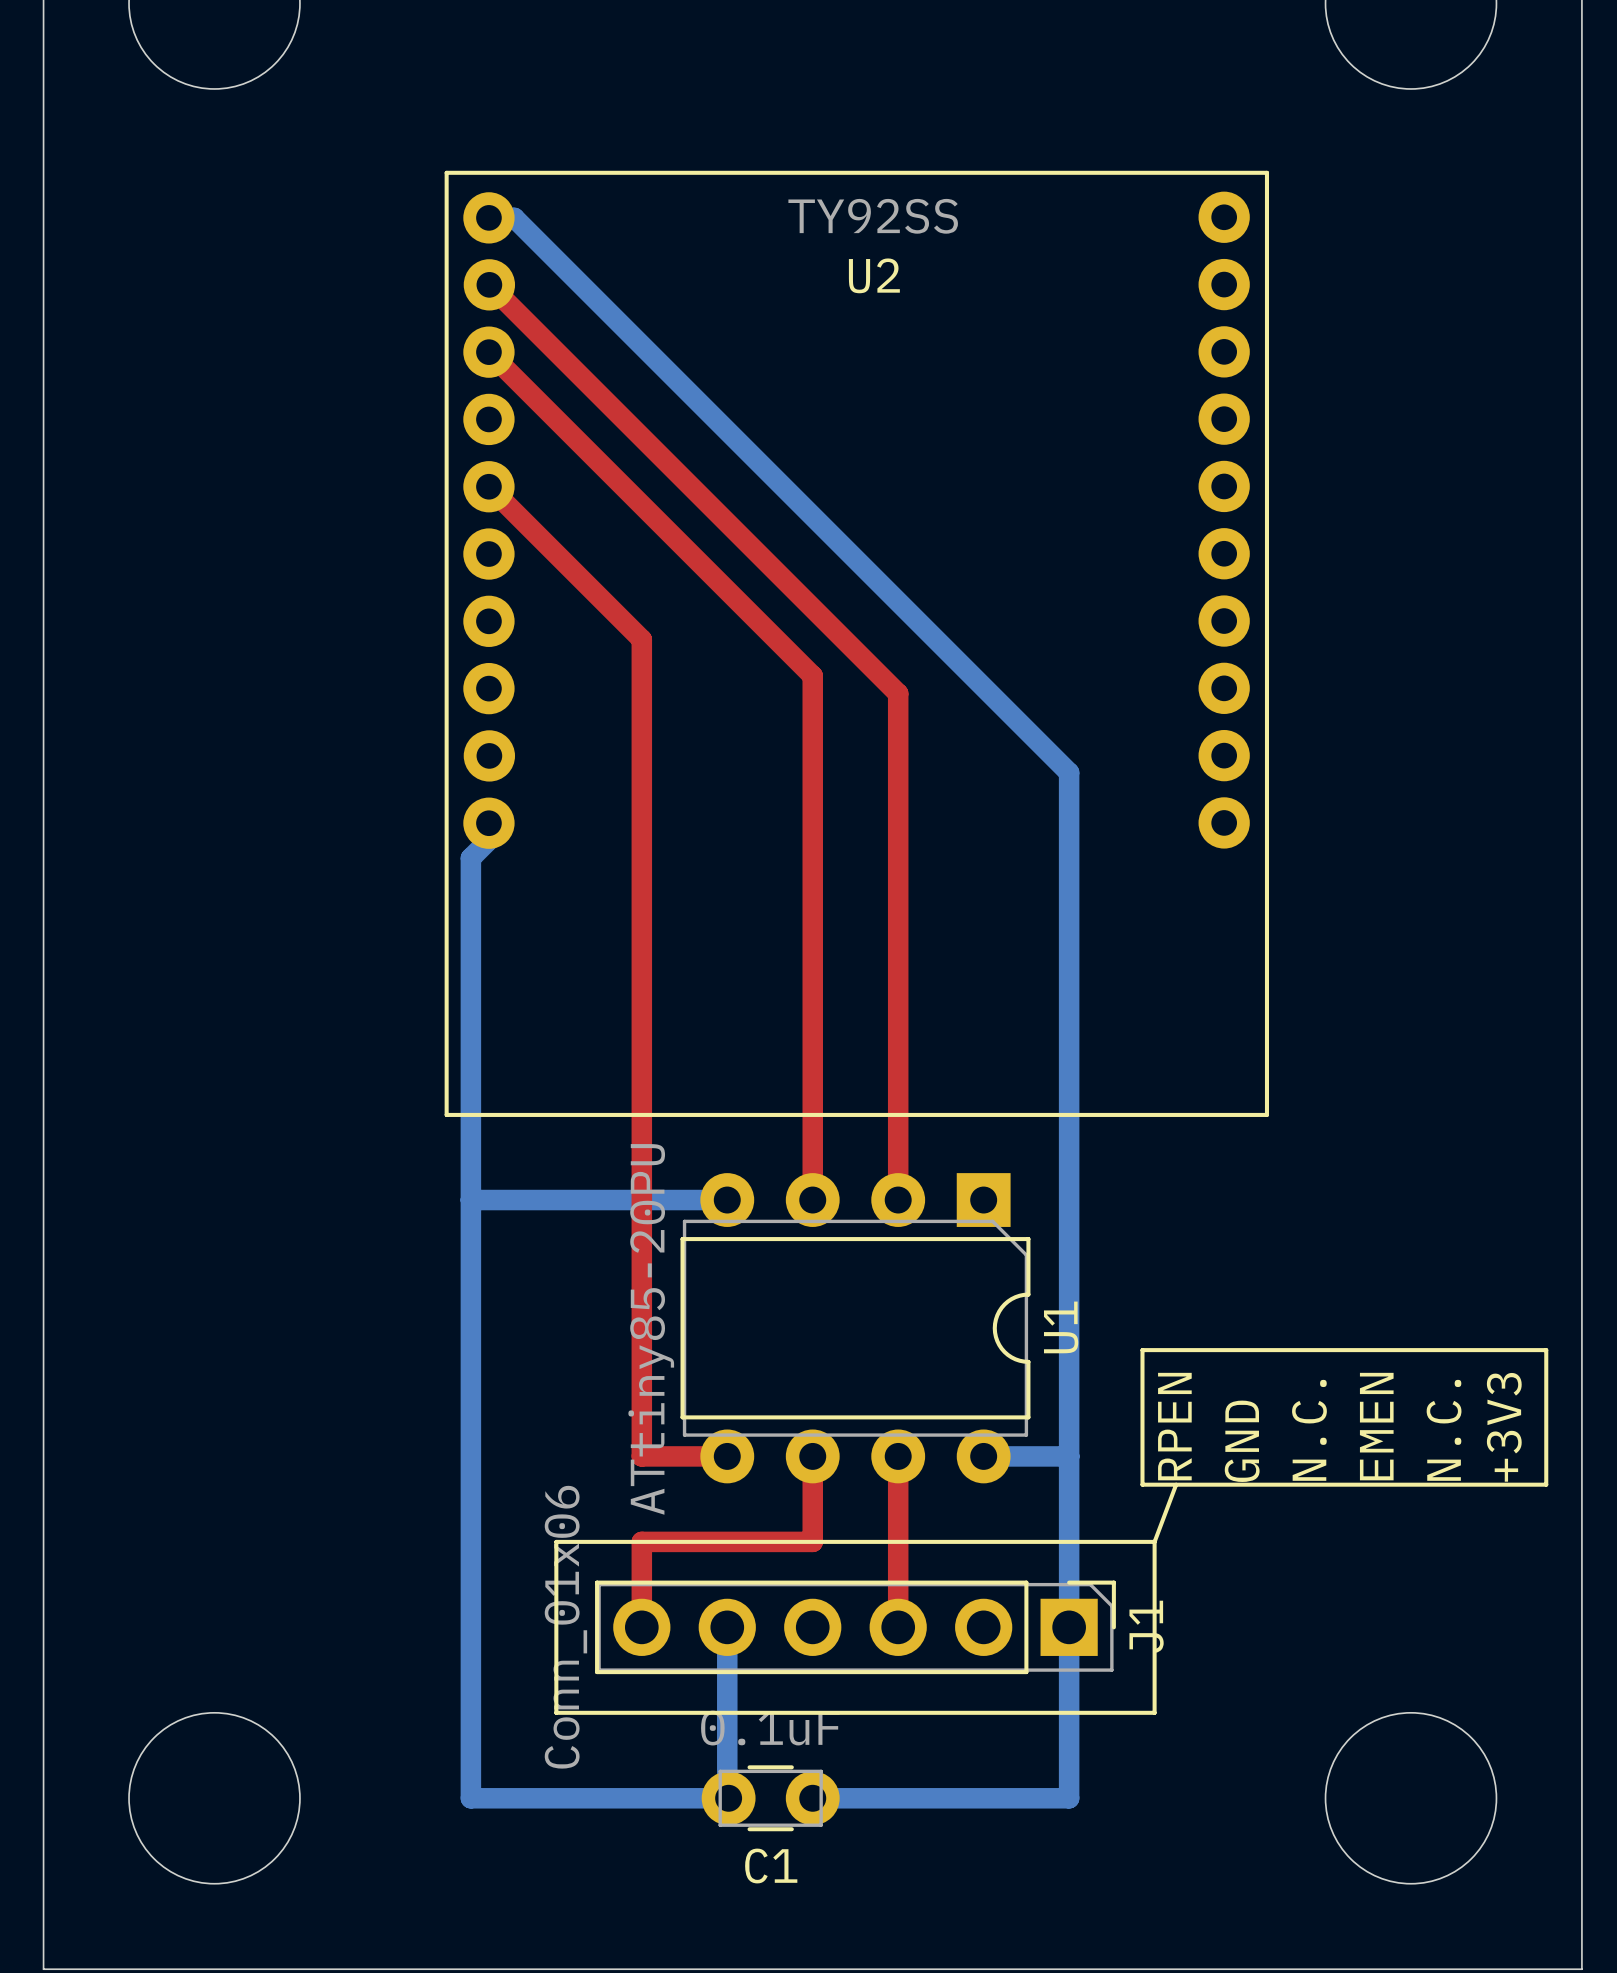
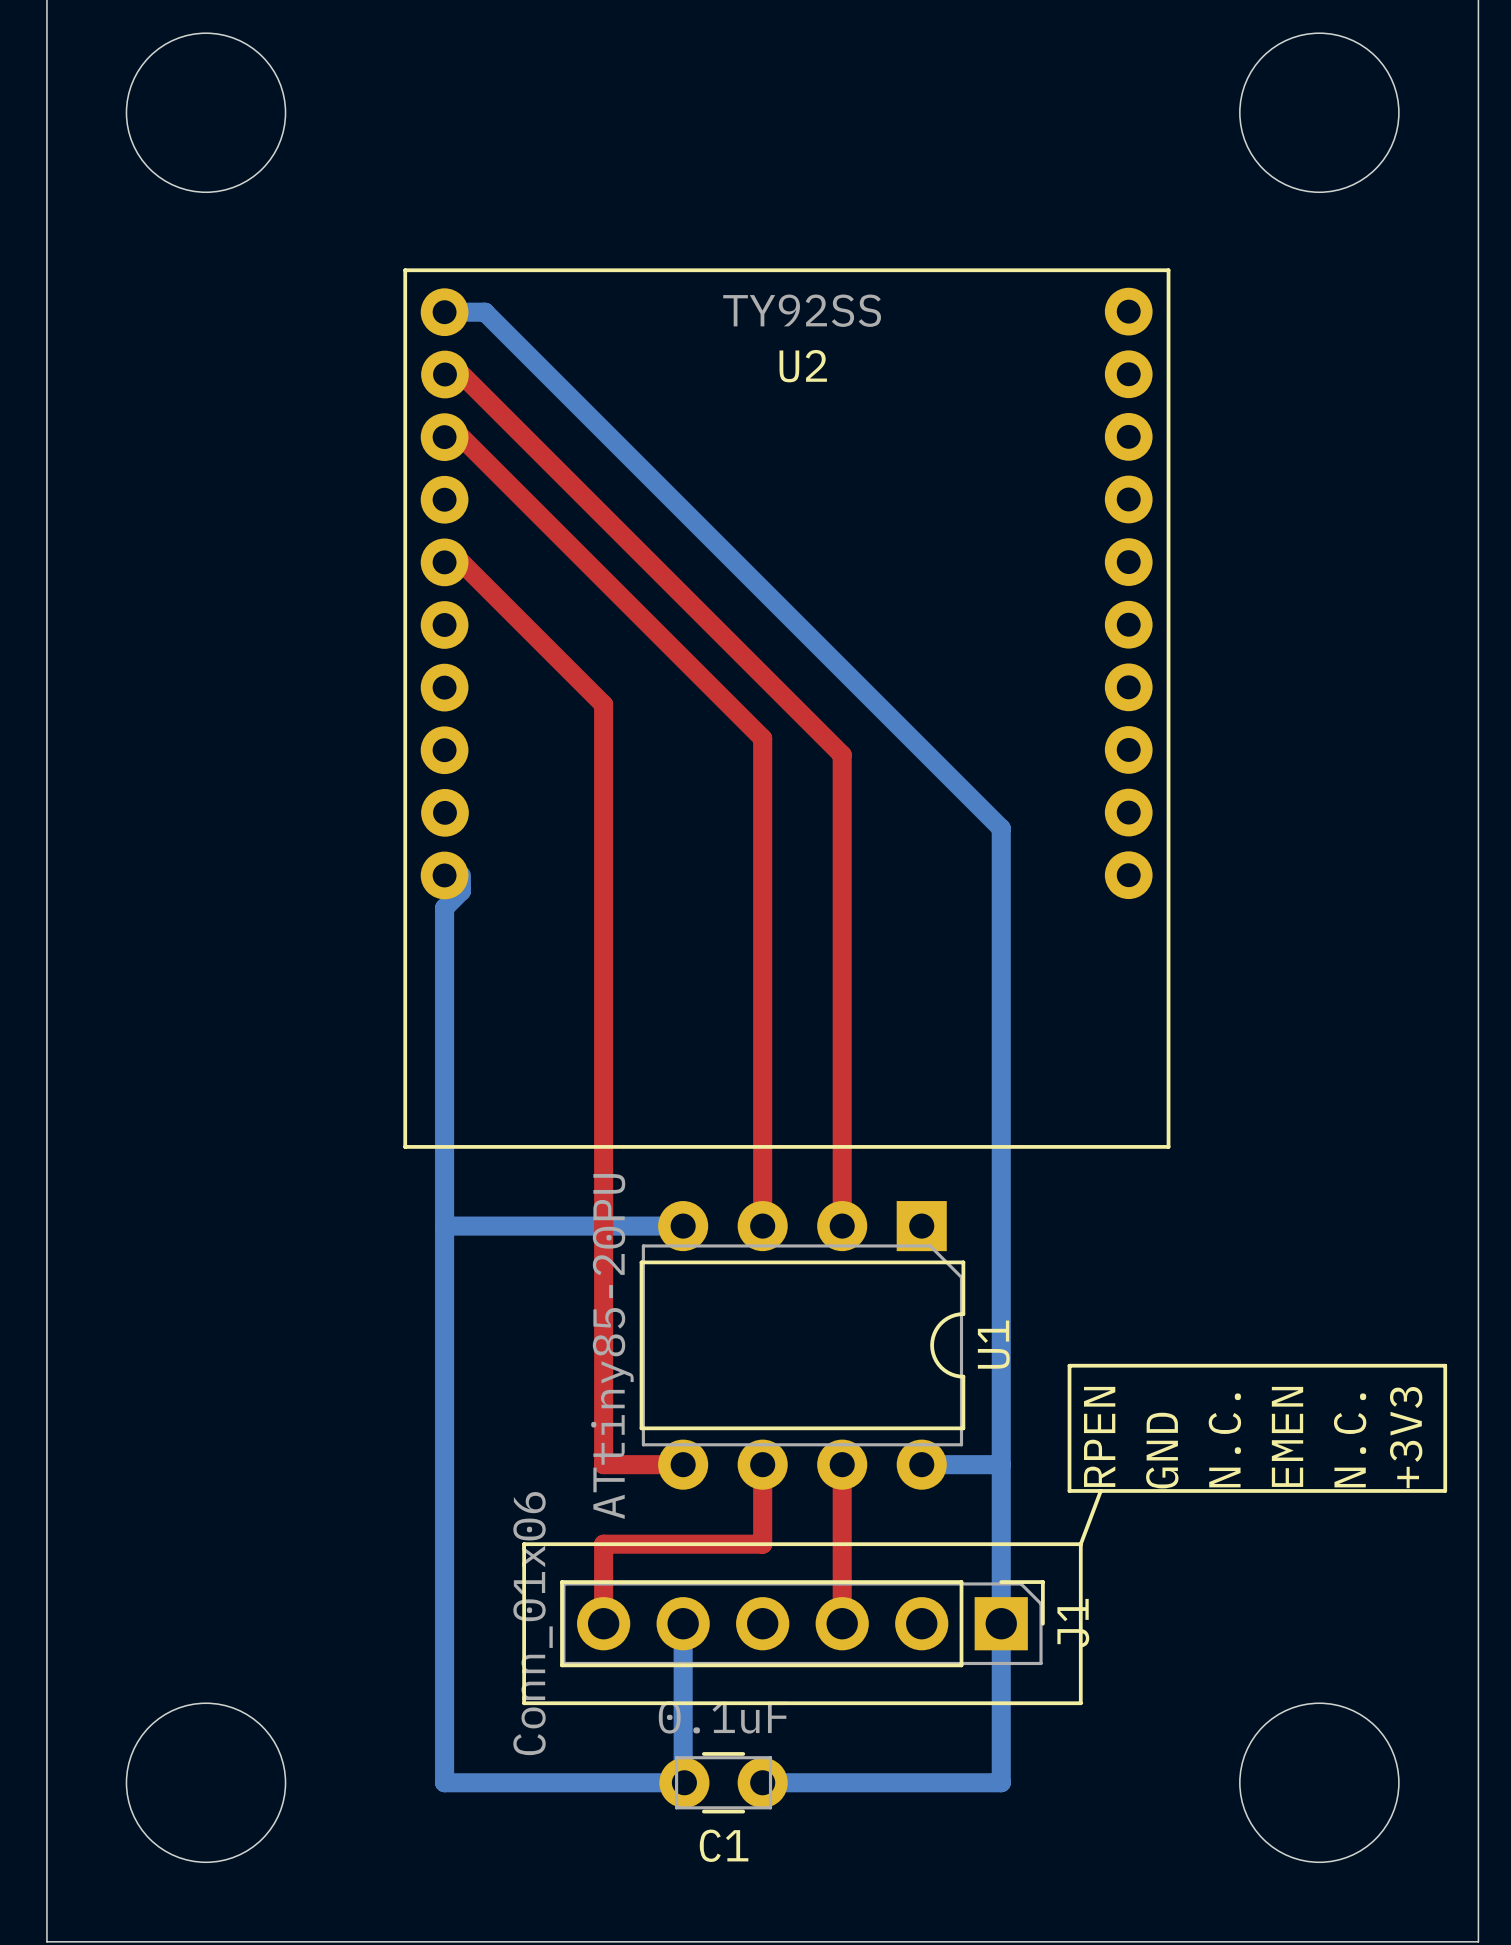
U2 position: (856, 643) -> (786, 708)

